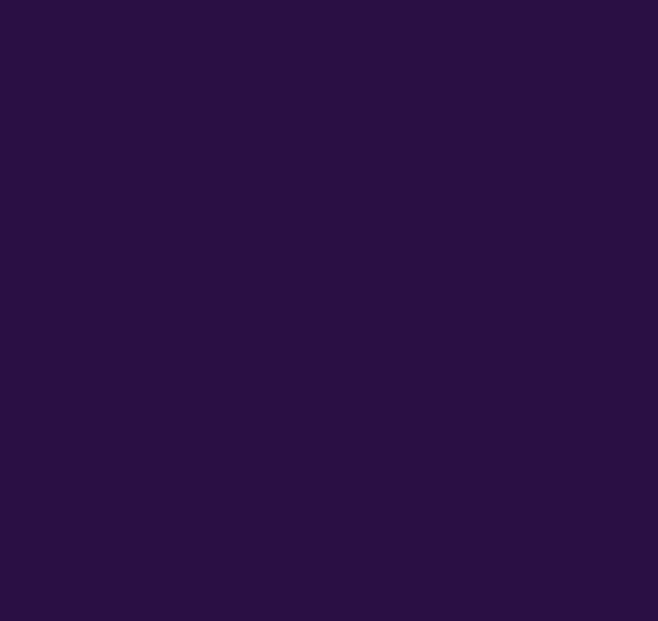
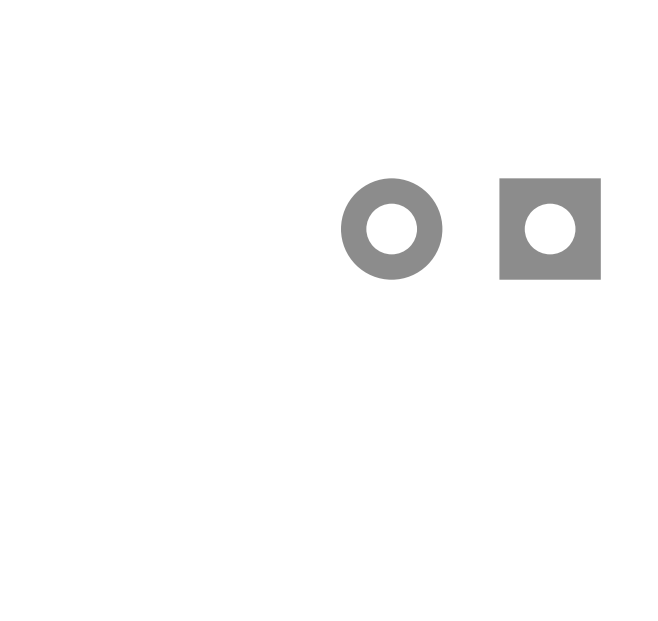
part: none -> (470, 229)

